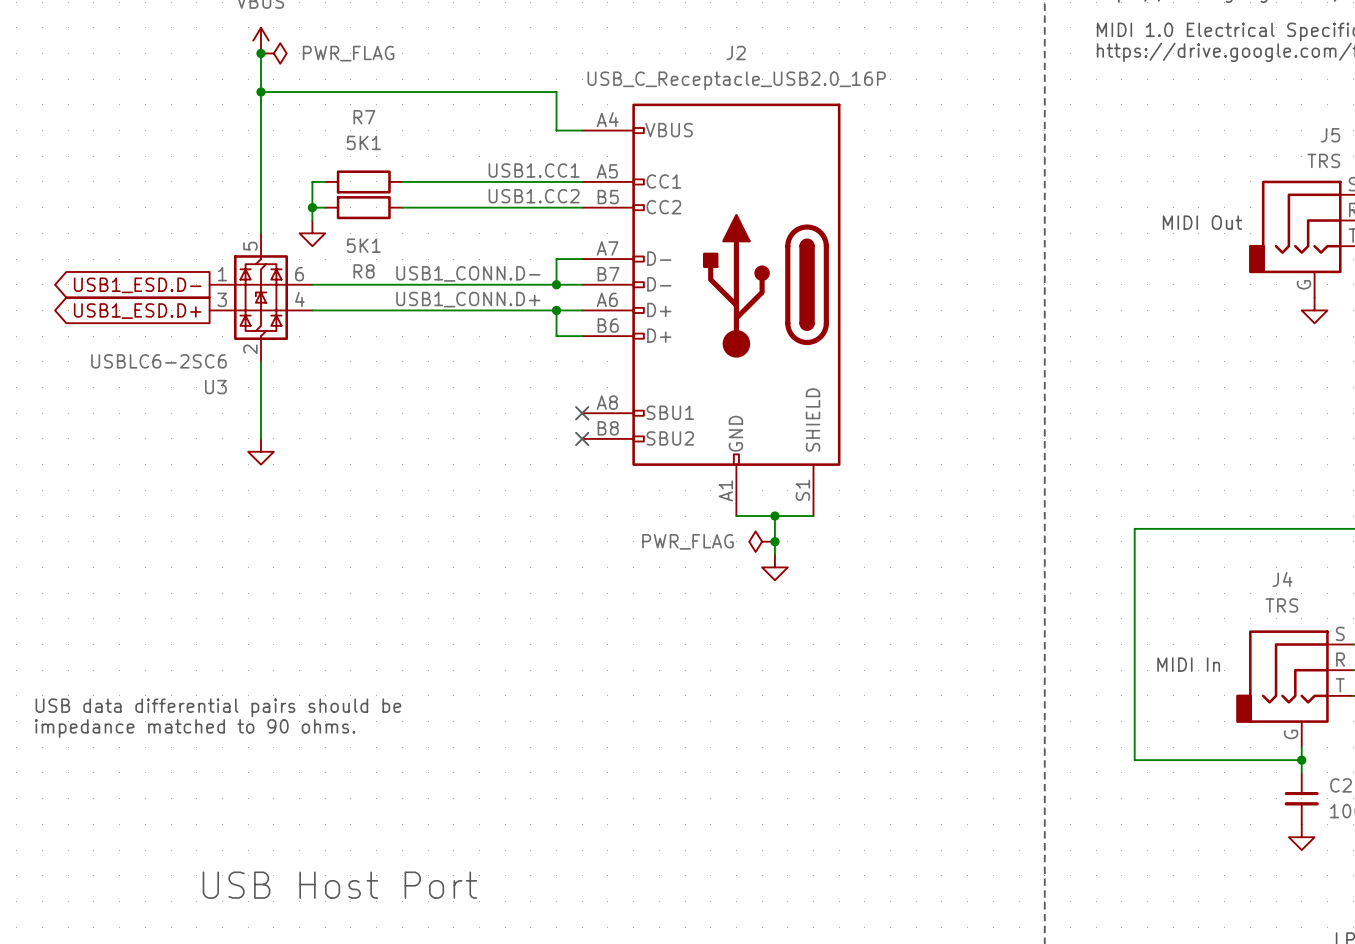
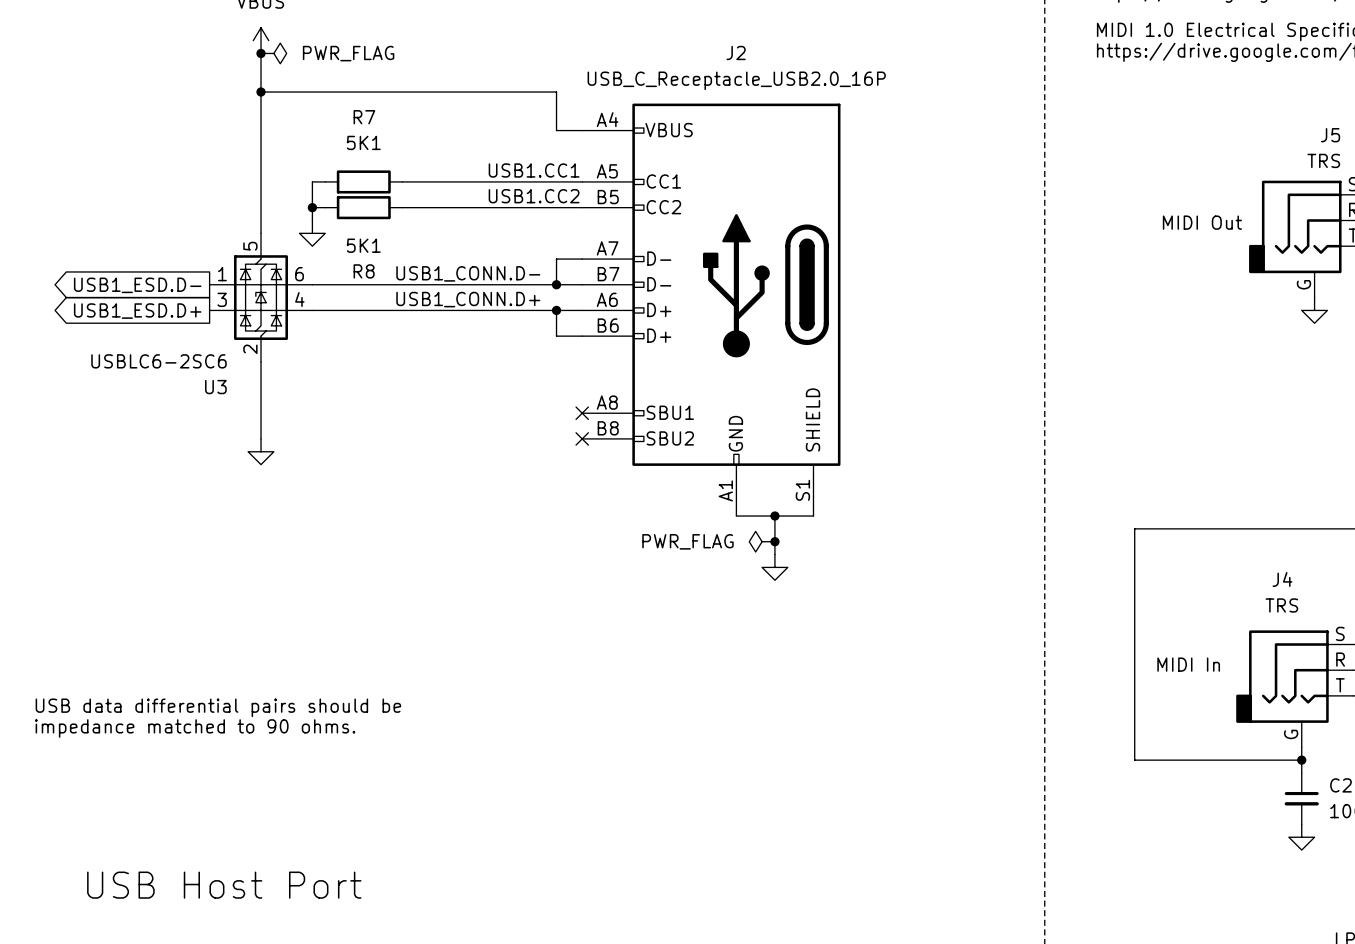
text position: USB Host Port (339, 885) -> USB Host Port (224, 885)

